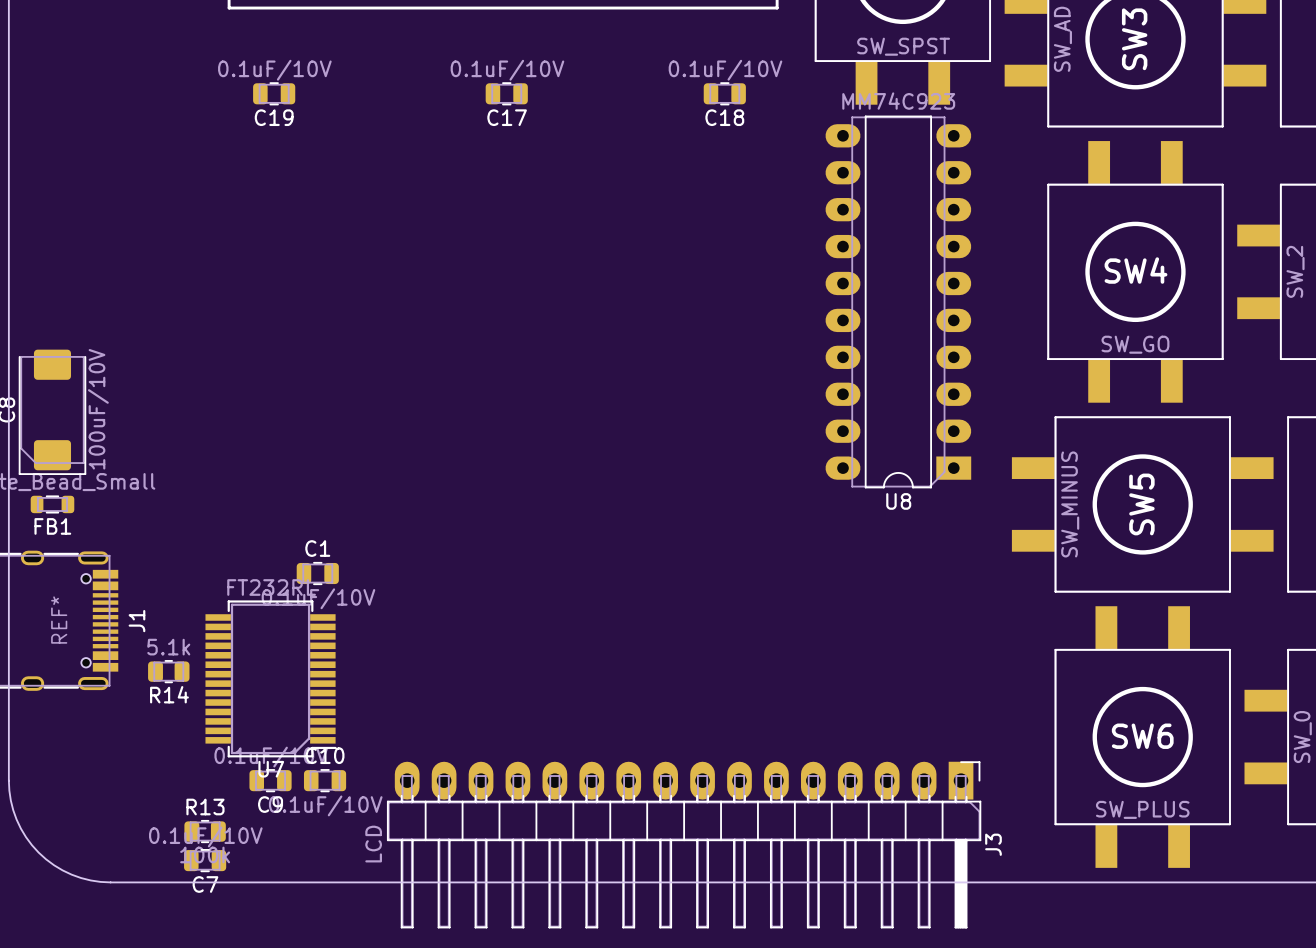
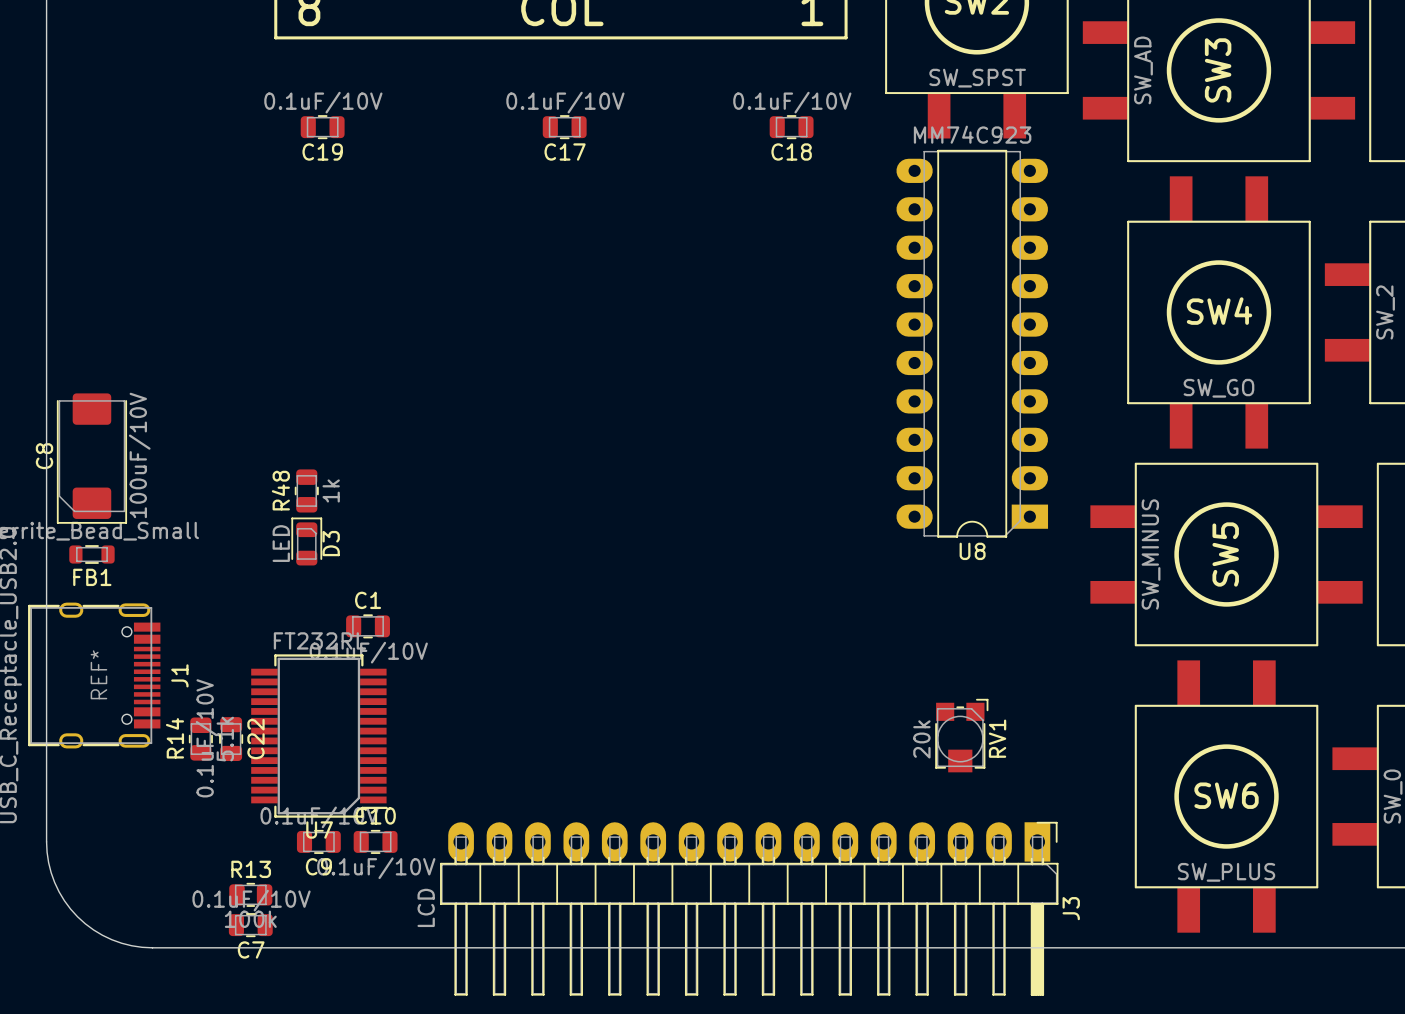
R48: none -> 1k (306, 490)
D3: none -> LED (306, 541)
R14 rotation: 0° (168, 671) -> 90° clockwise (200, 739)
RV1: none -> 20k (961, 735)
C22: none -> 0.1uF/10V (231, 739)

